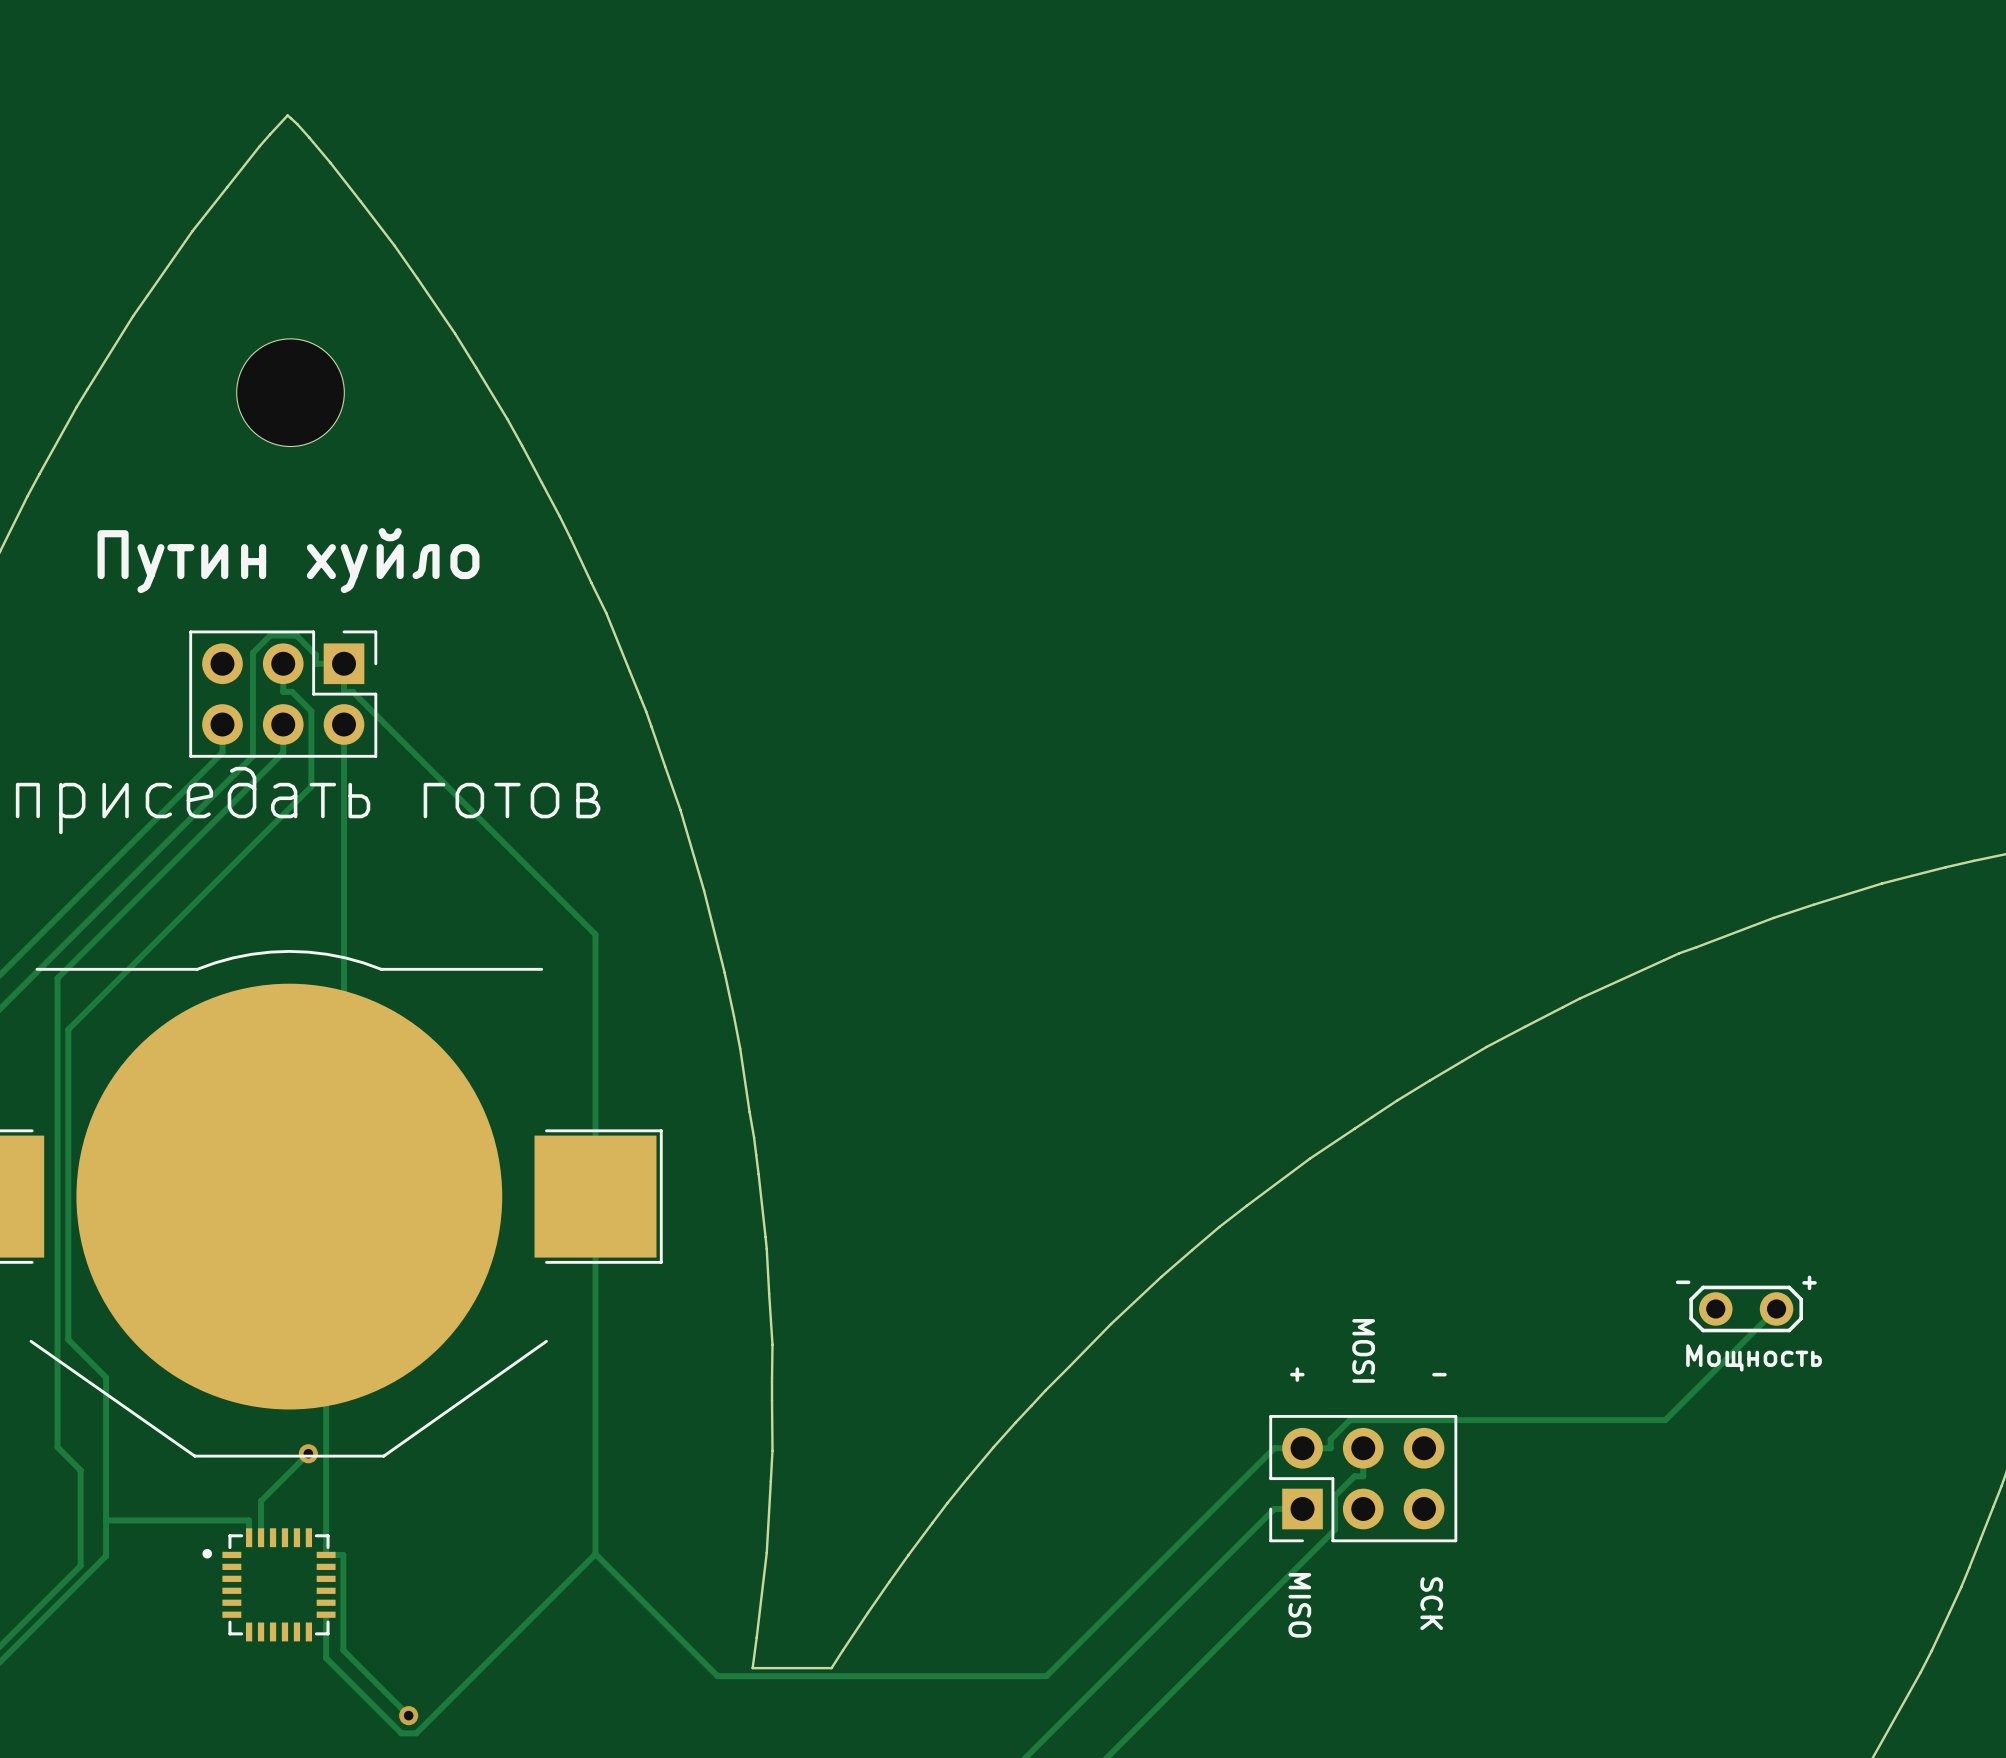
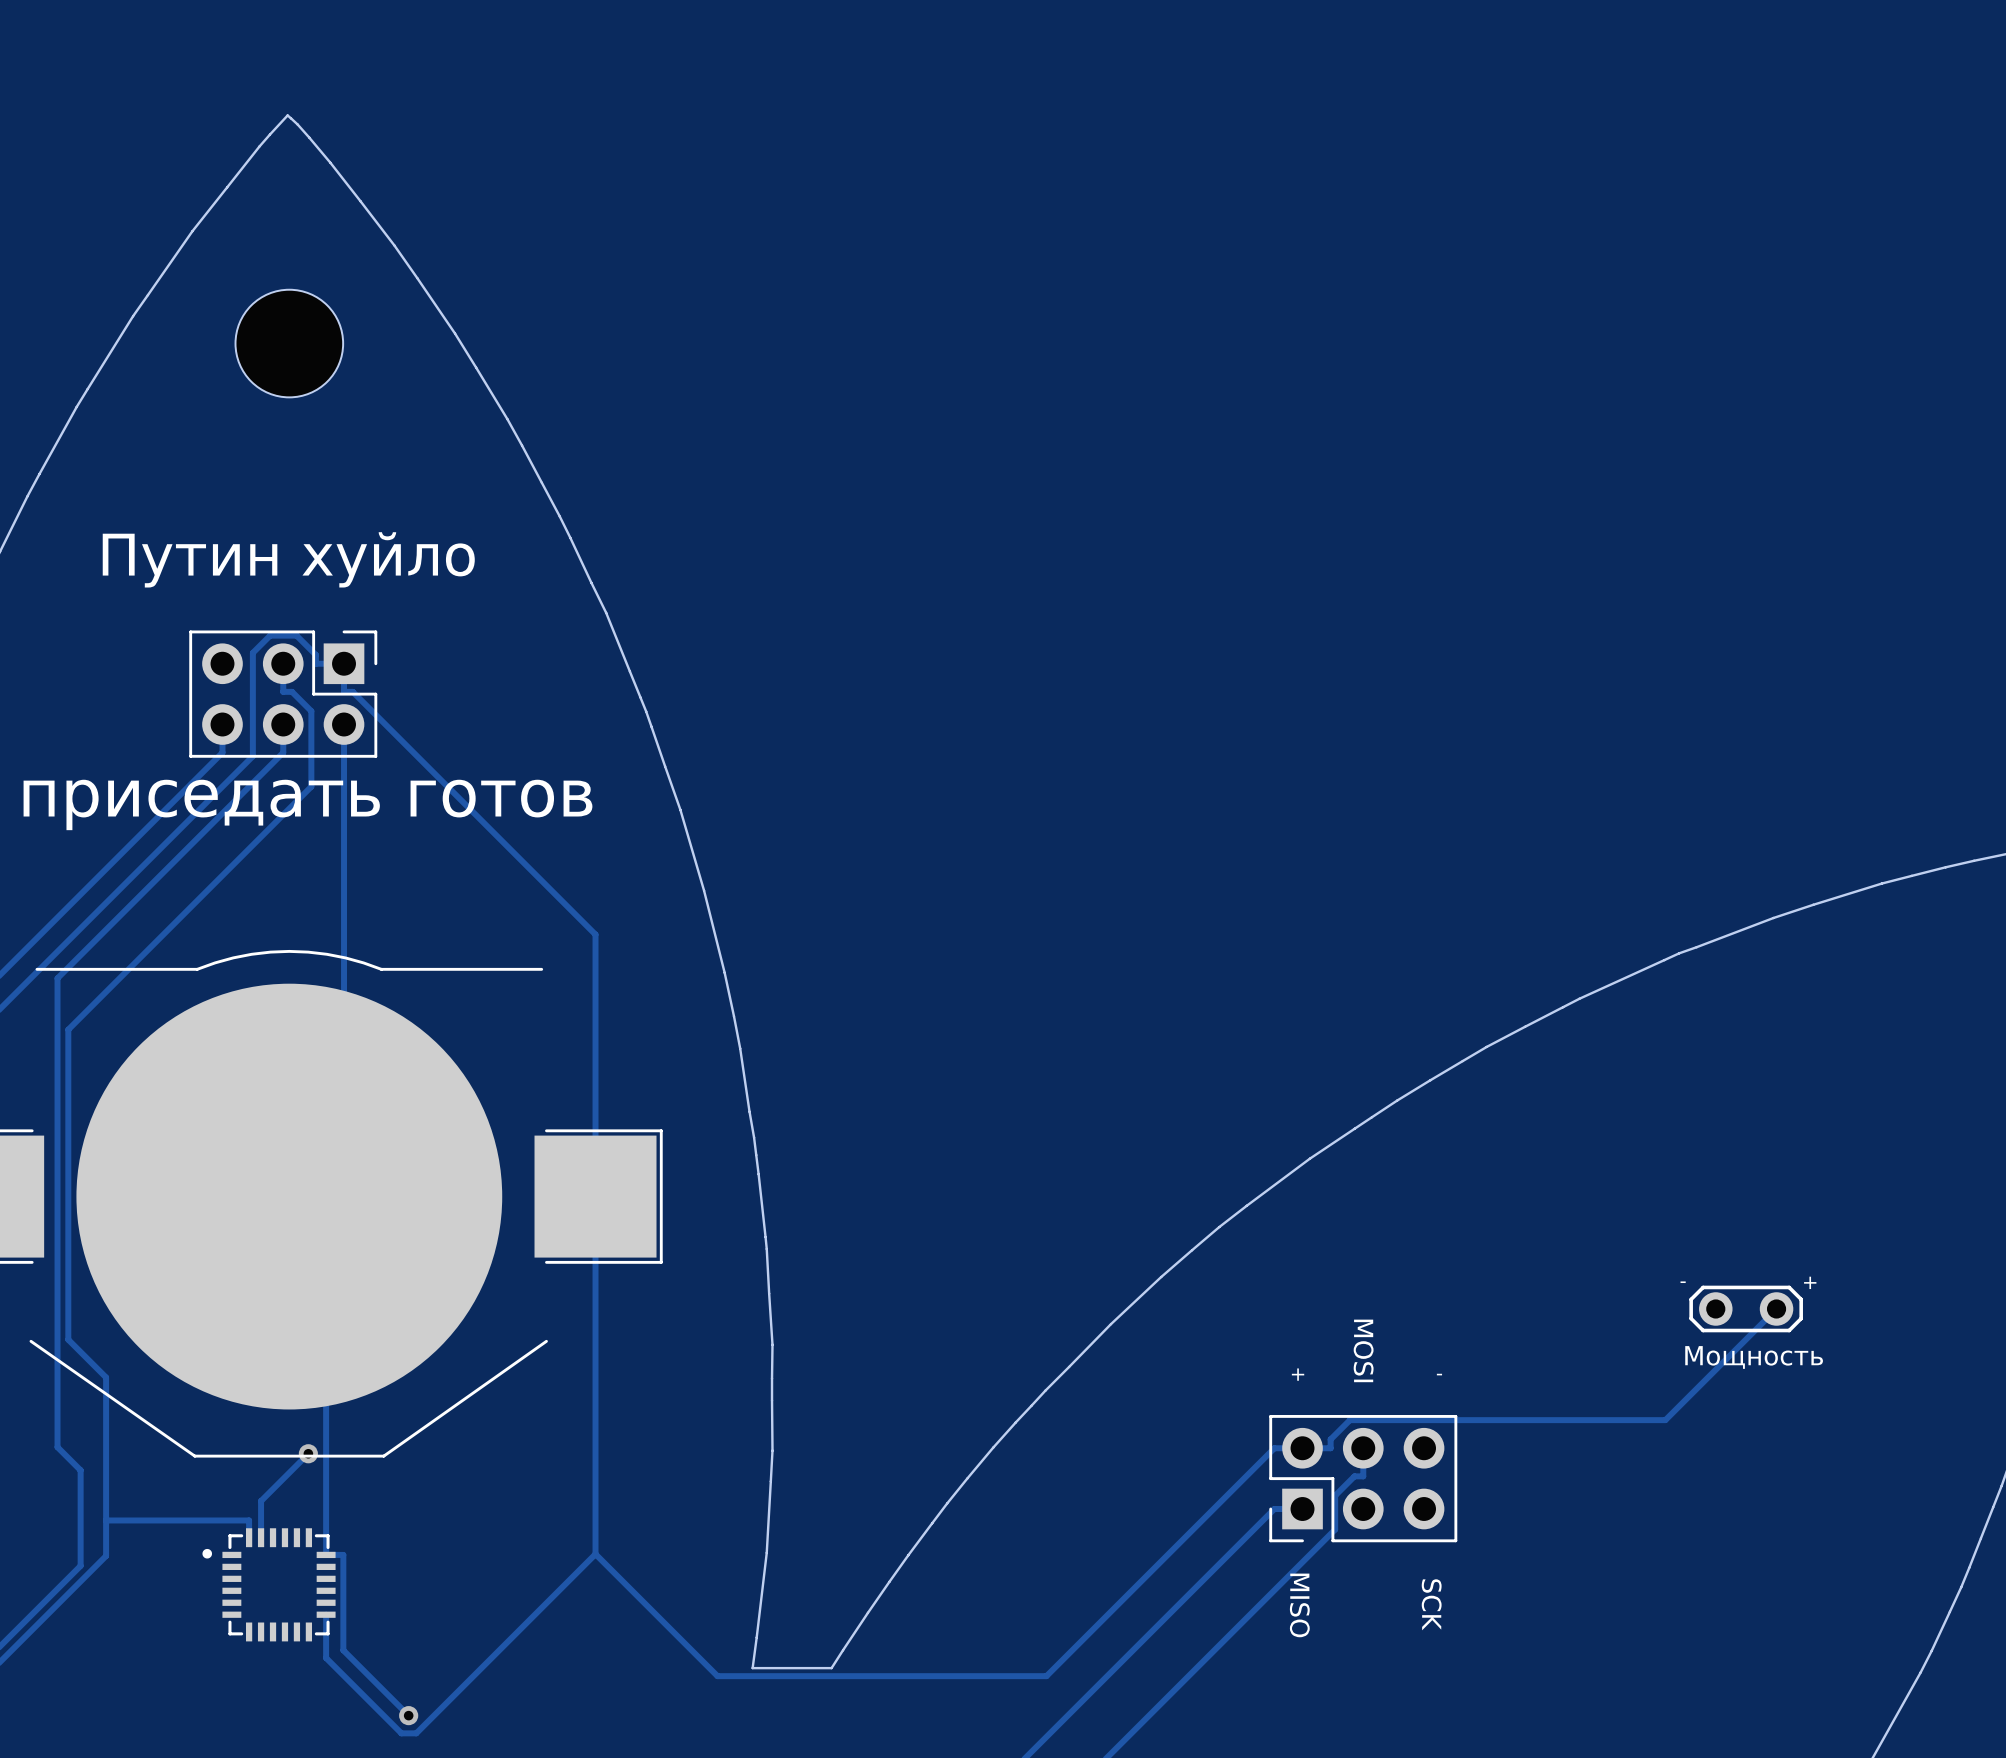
part position: (290, 392) -> (289, 343)

